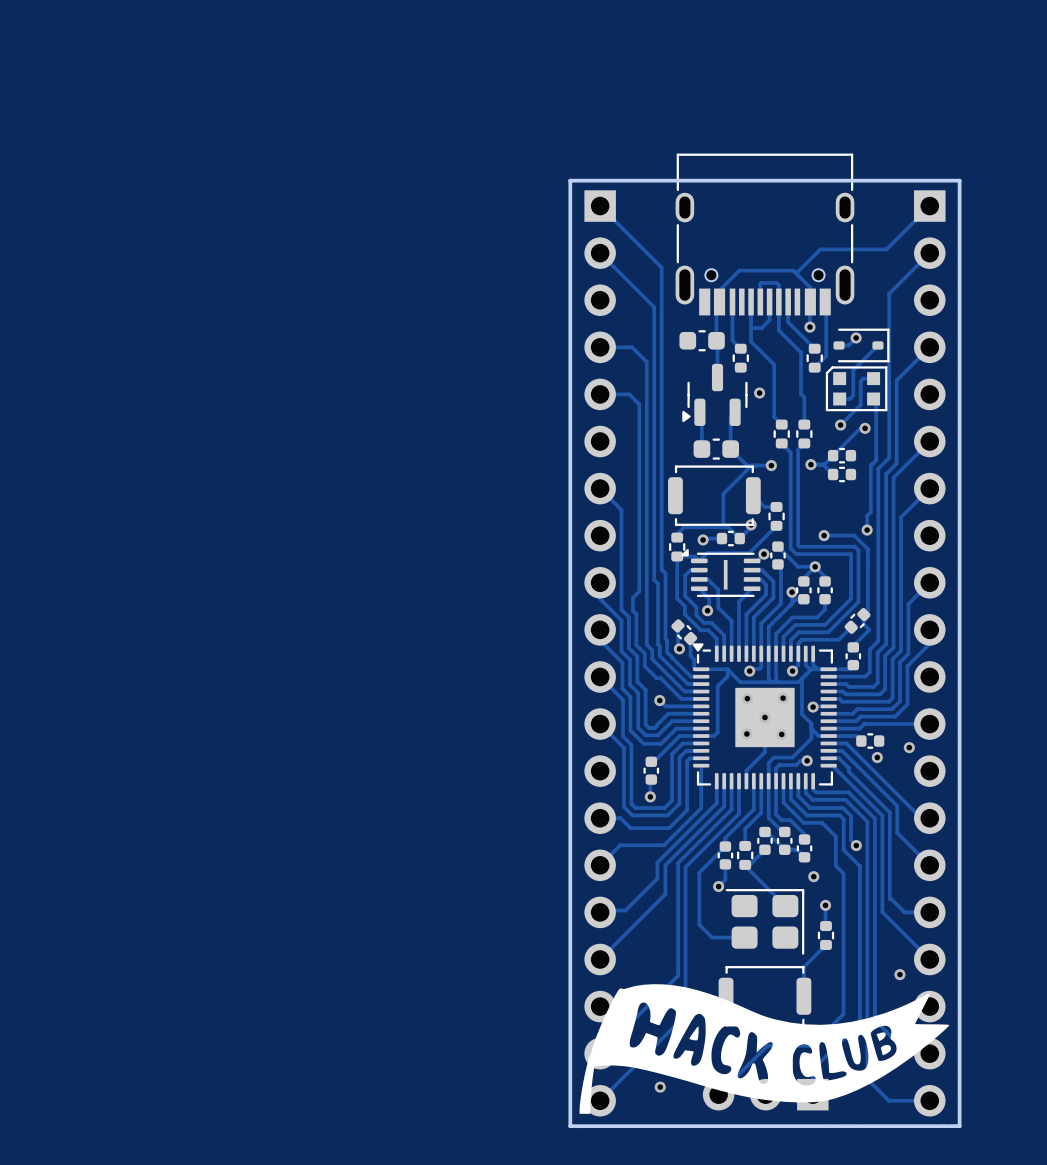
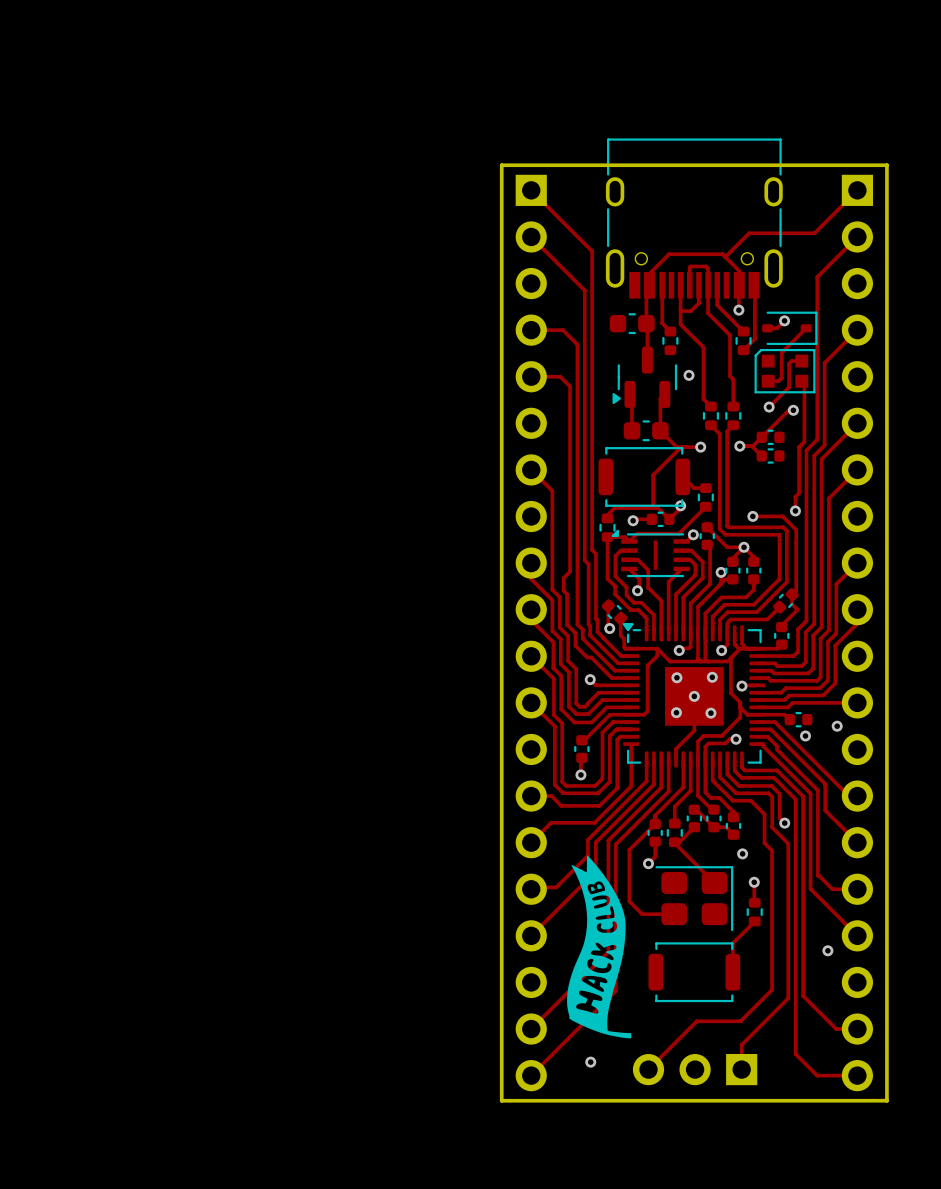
drawing: none -> [567, 855, 632, 1039]
drawing: [579, 984, 950, 1114] -> none

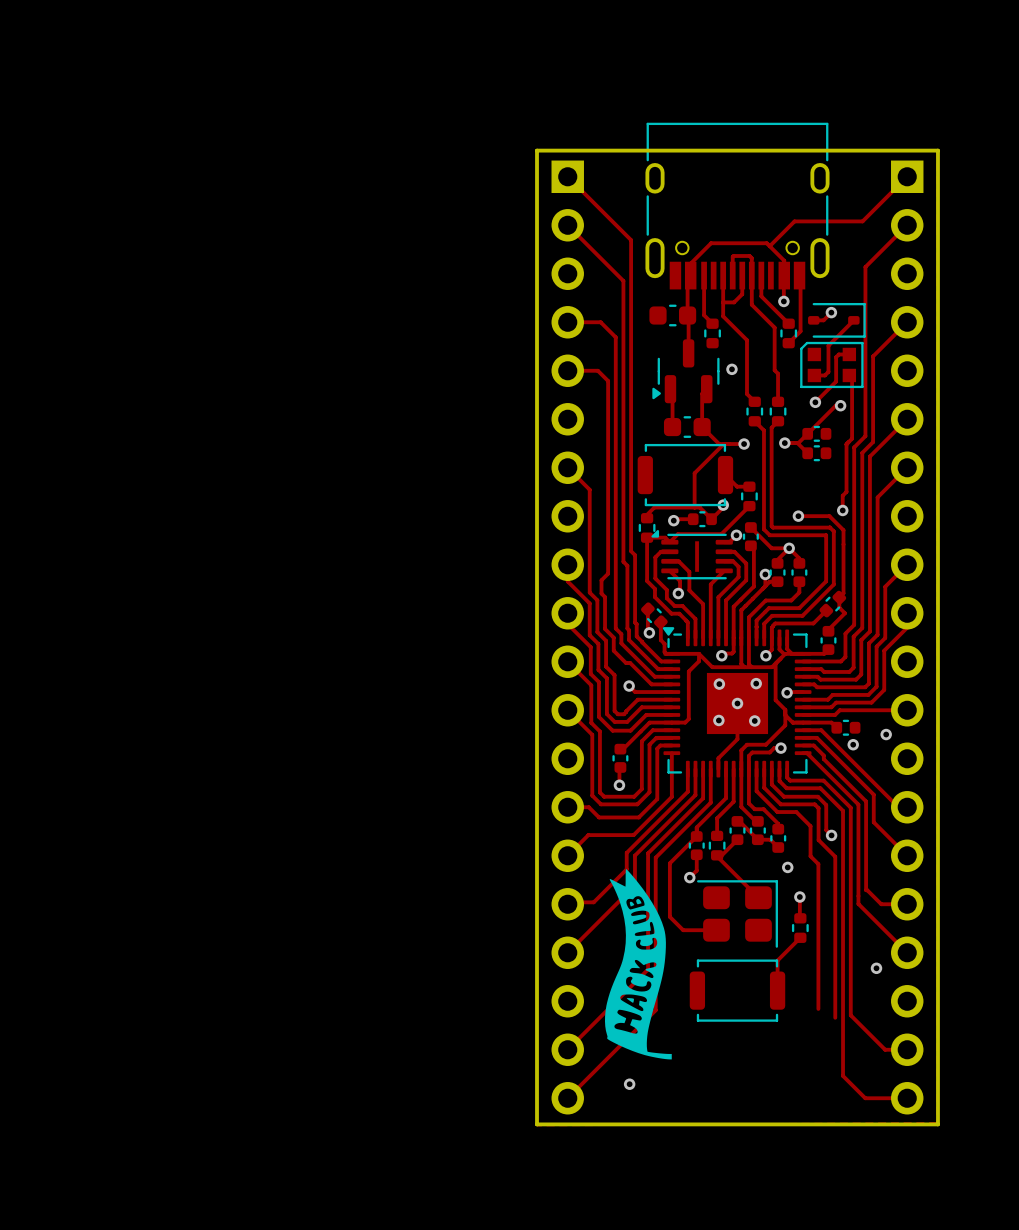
track: (772, 989) (740, 1021) -> none
track: (788, 998) (741, 1044) (741, 1069) -> none
track: (740, 1021) (696, 1021) (648, 1069) -> none
part: (695, 1069) -> none

